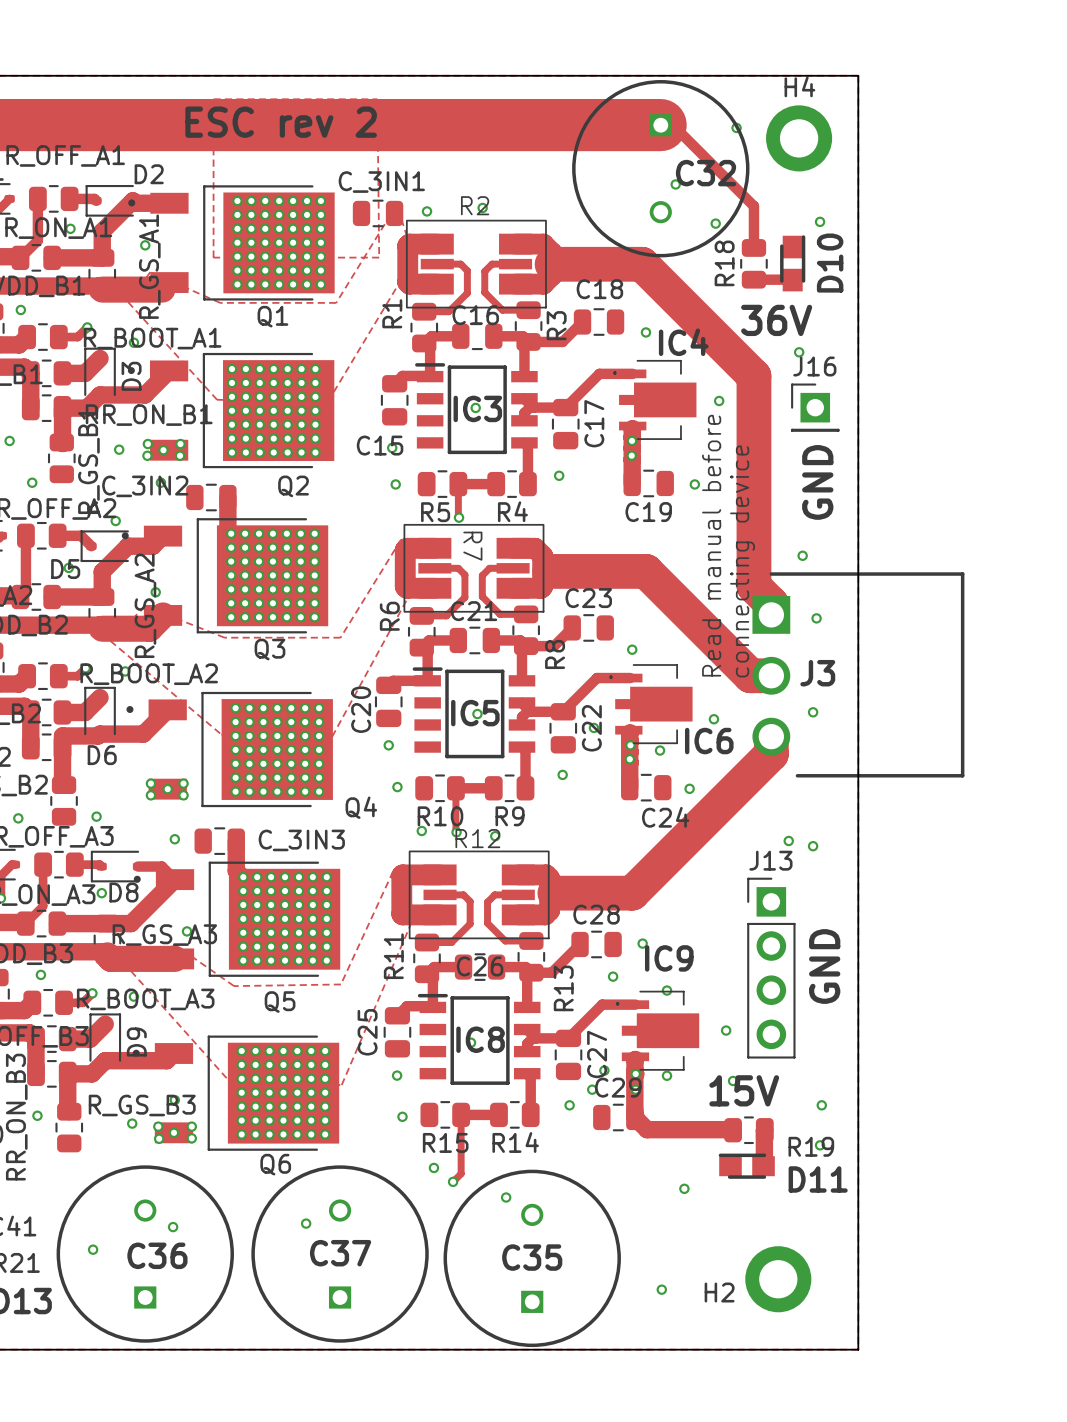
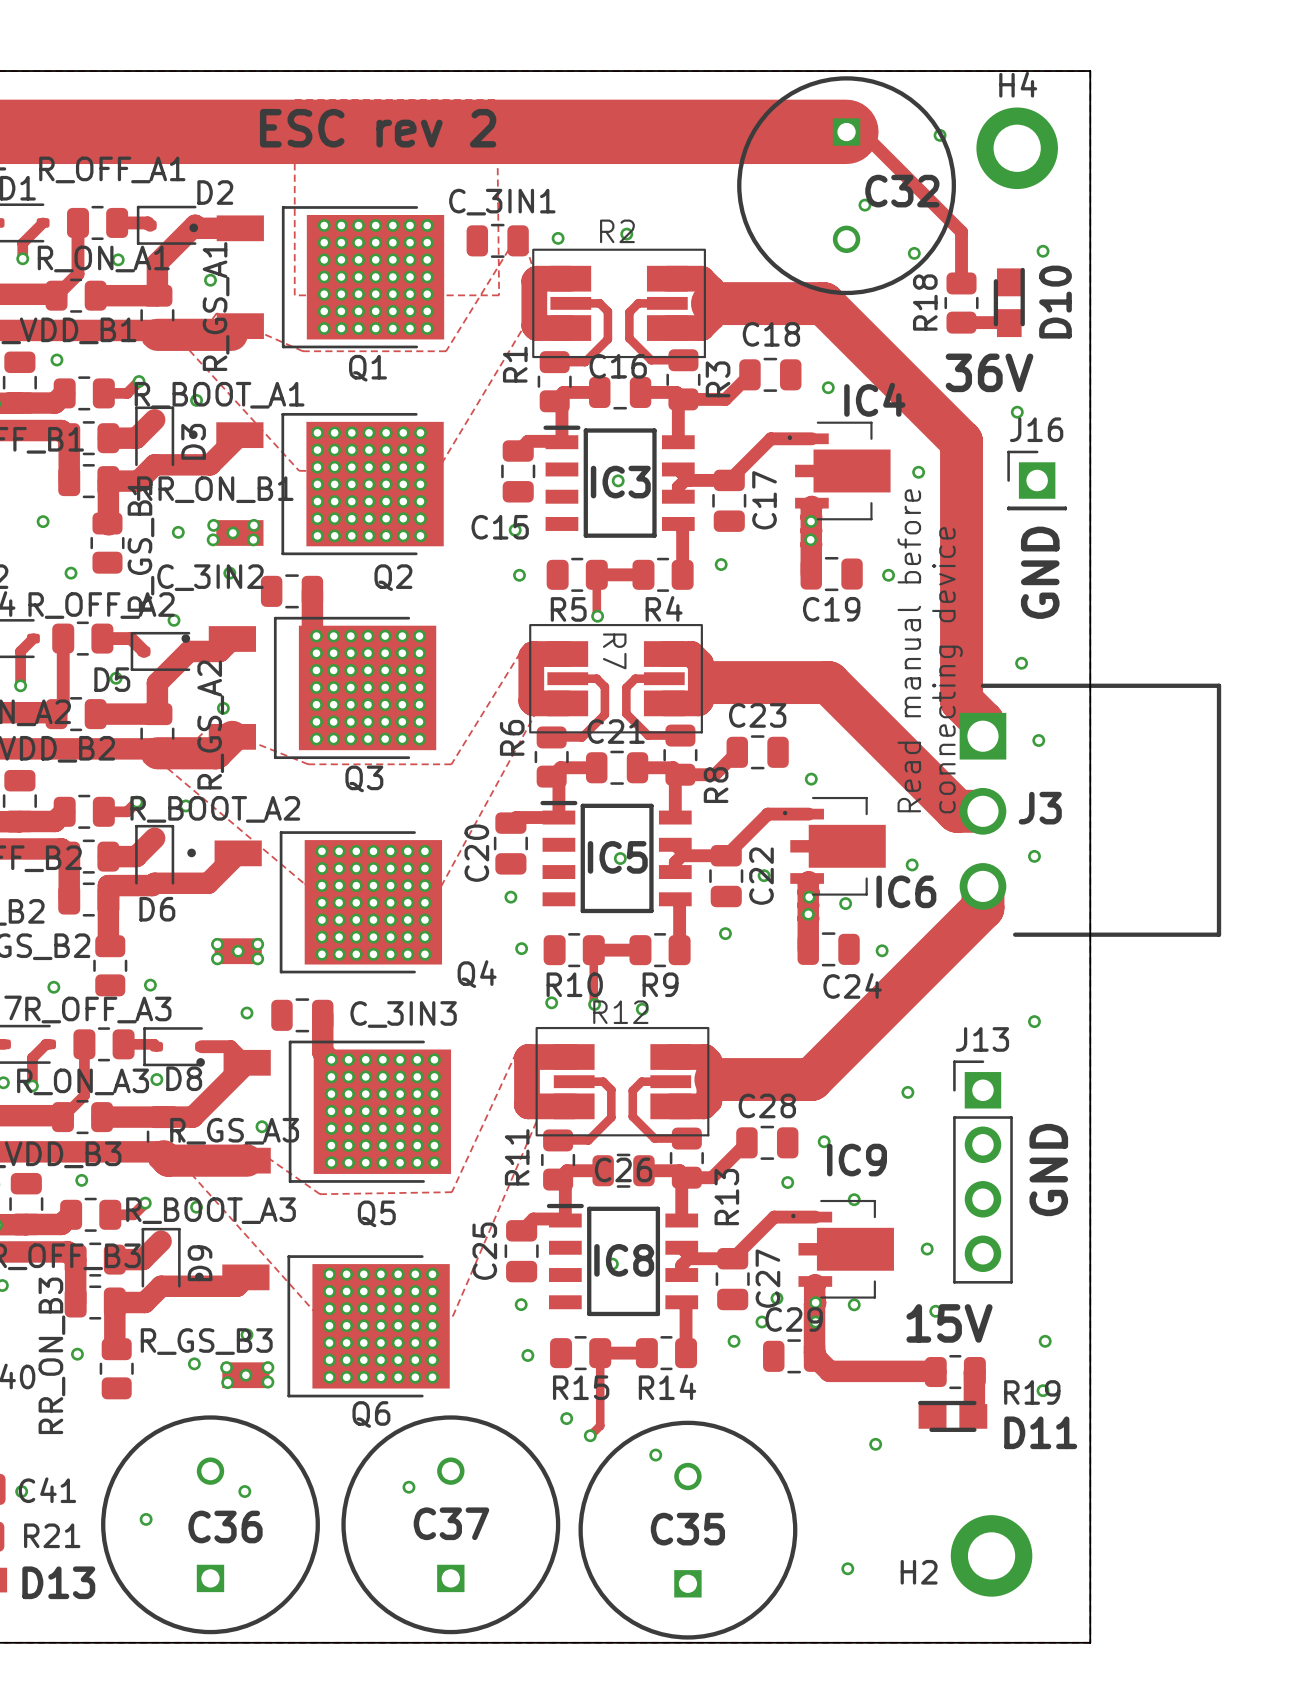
via position: (788, 840) -> (907, 1092)

